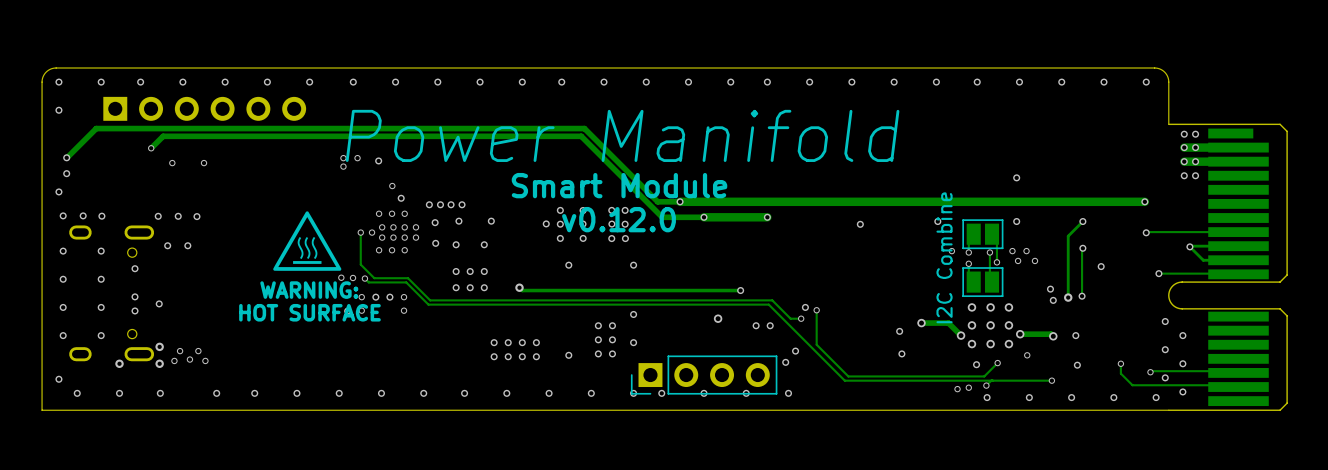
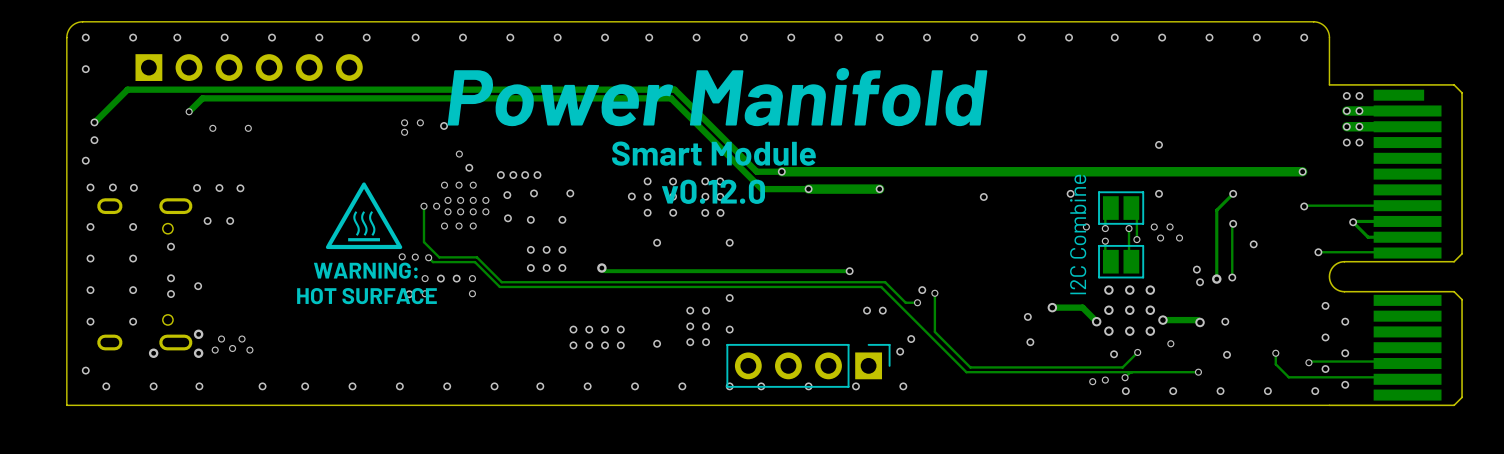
via: (718, 318) -> none
part rotation: 0° (704, 375) -> 180° (808, 365)

